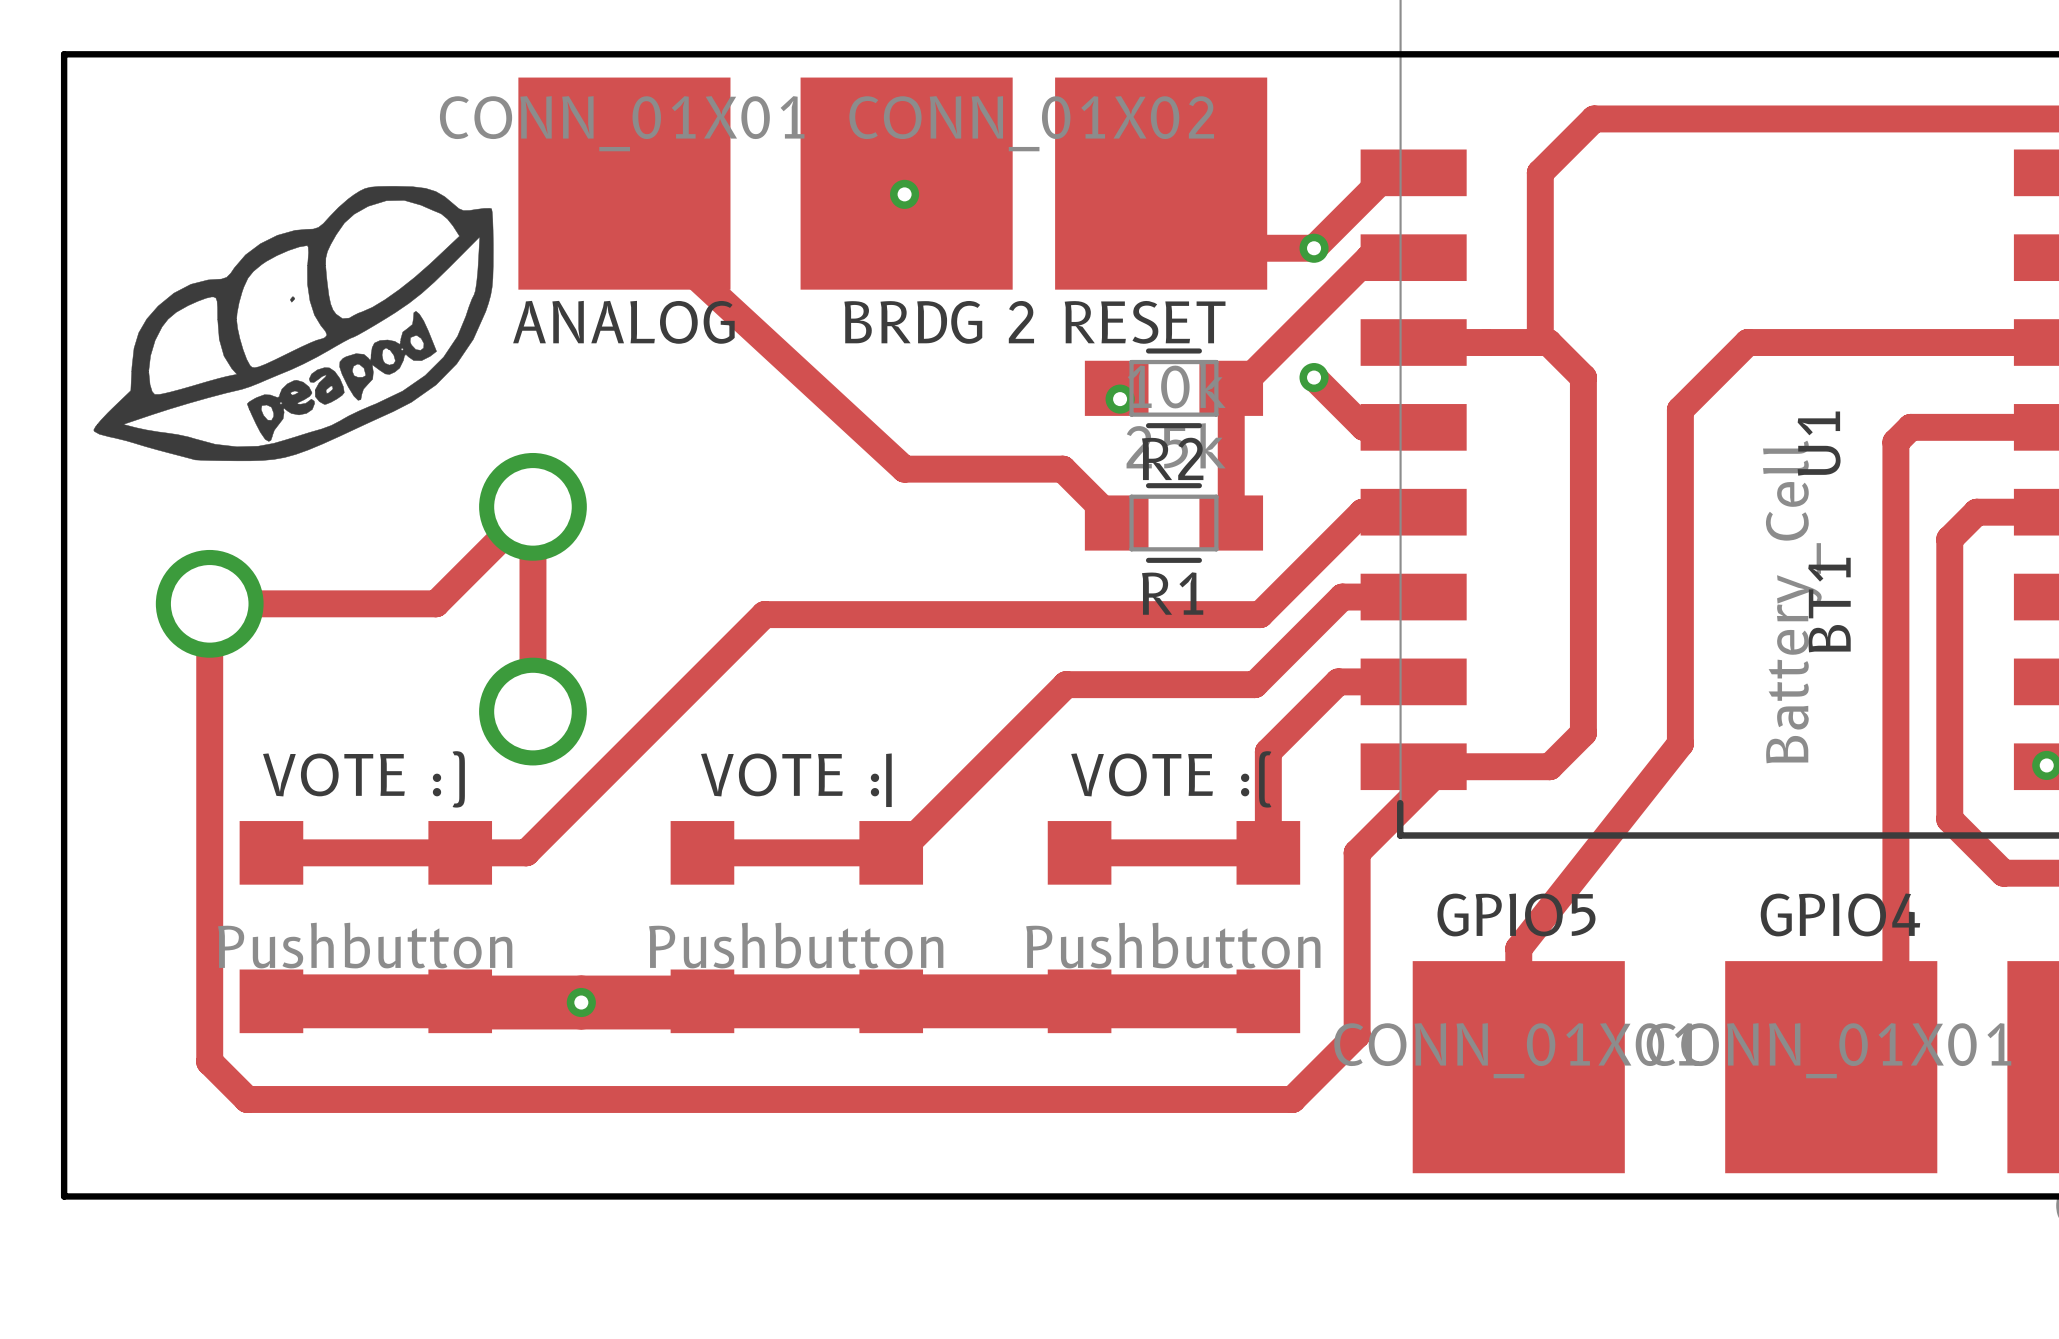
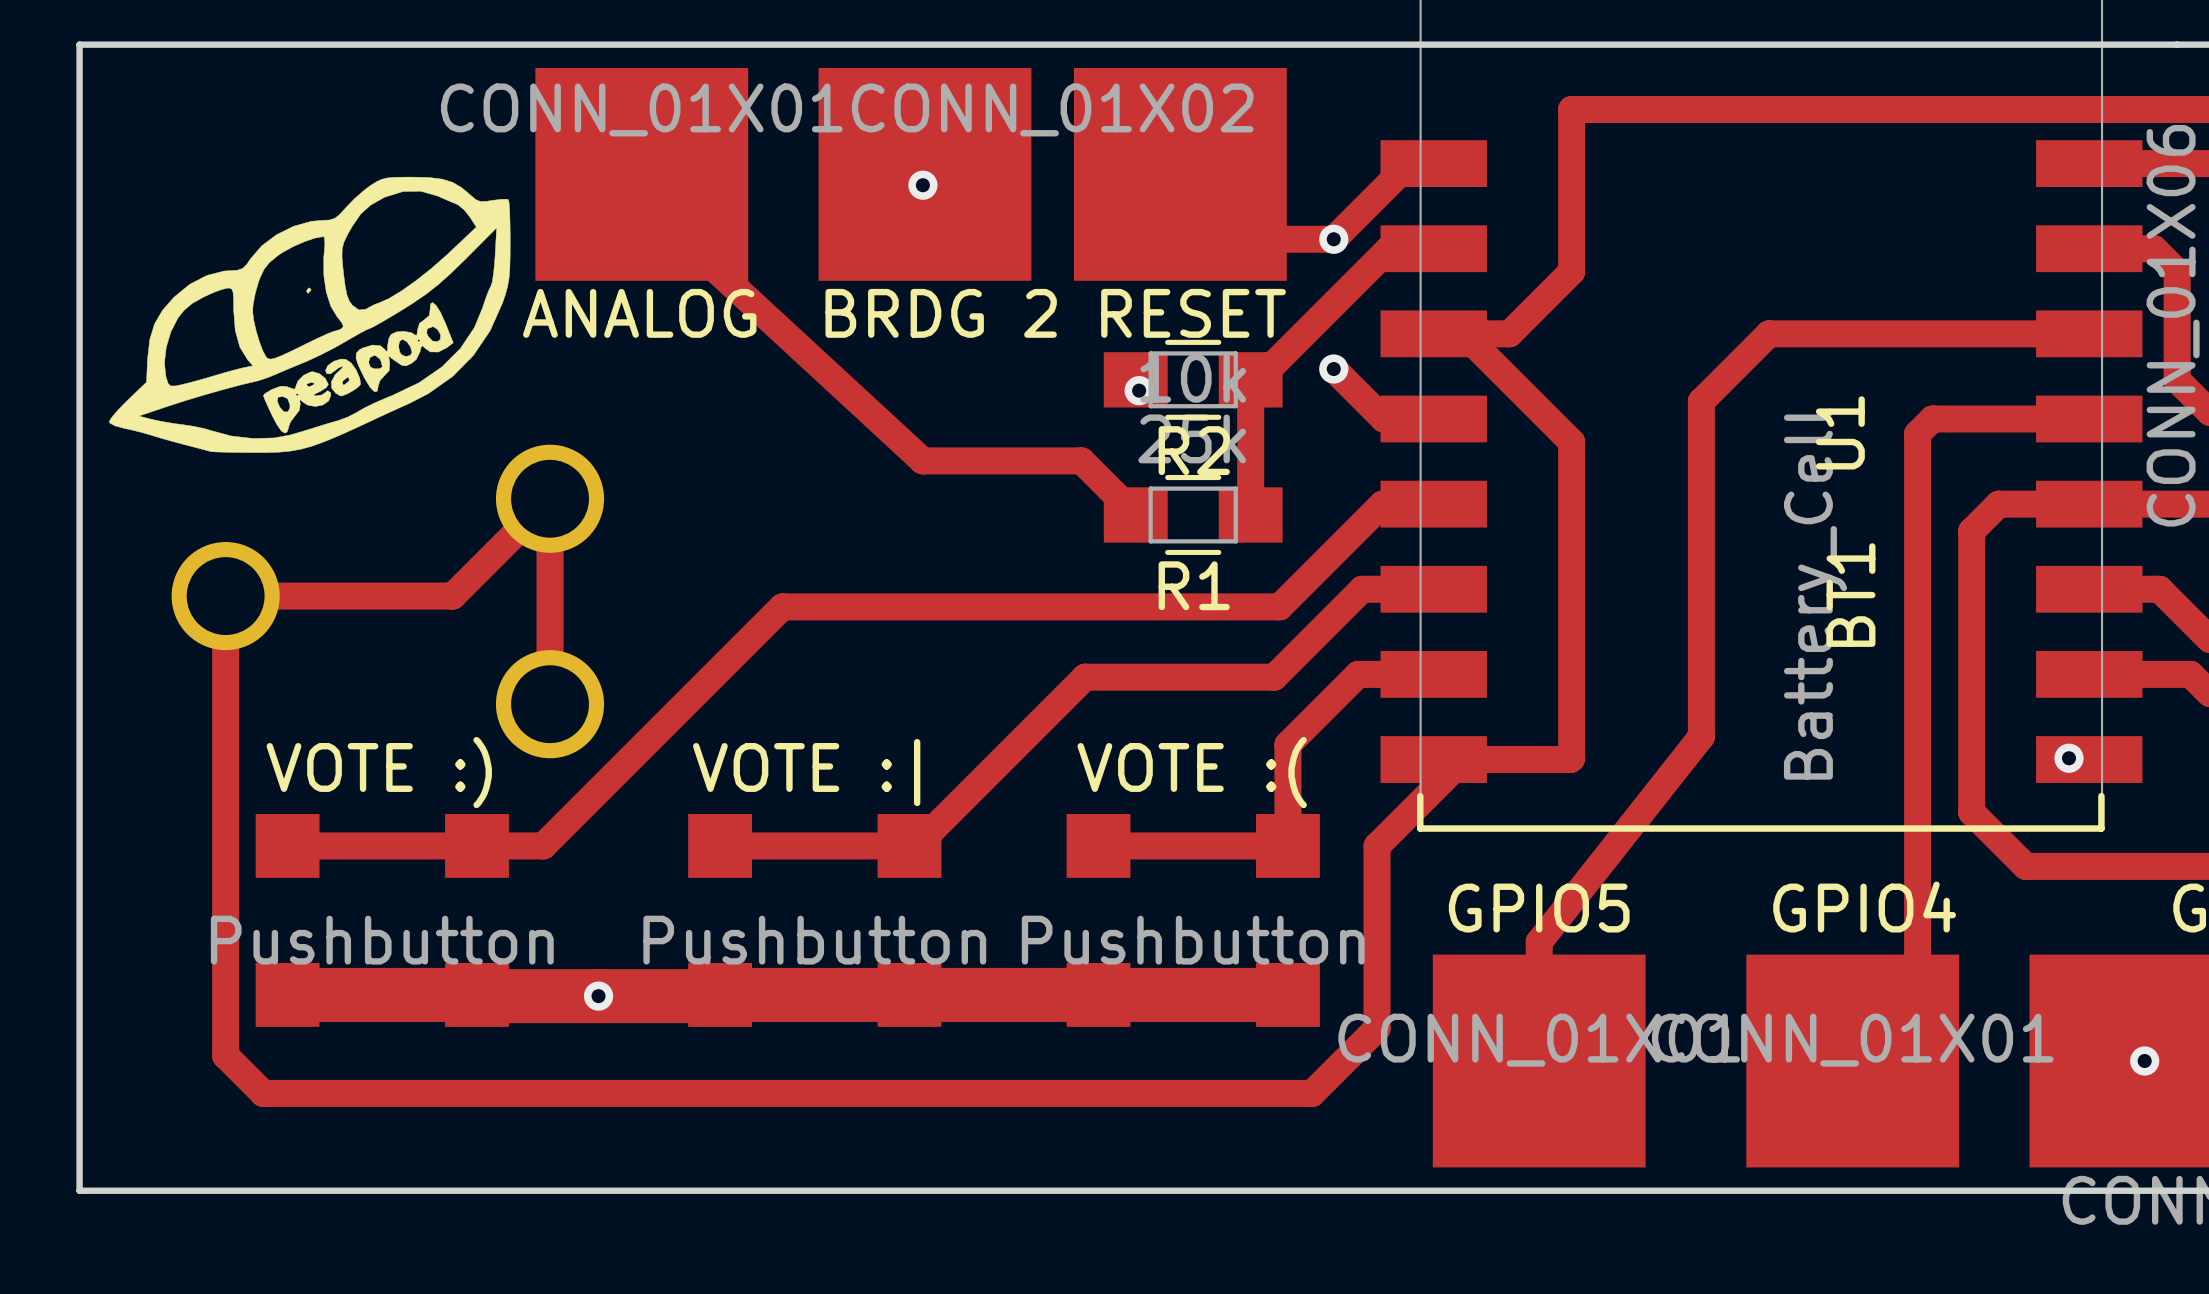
track: (1594, 118) (1540, 172) (1540, 342) -> (1614, 109) (1571, 109) (1571, 271) (1509, 333)
track: (1489, 342) (1548, 342) (1583, 377) (1583, 733) (1551, 765) -> (1463, 333) (1571, 441) (1571, 758)

